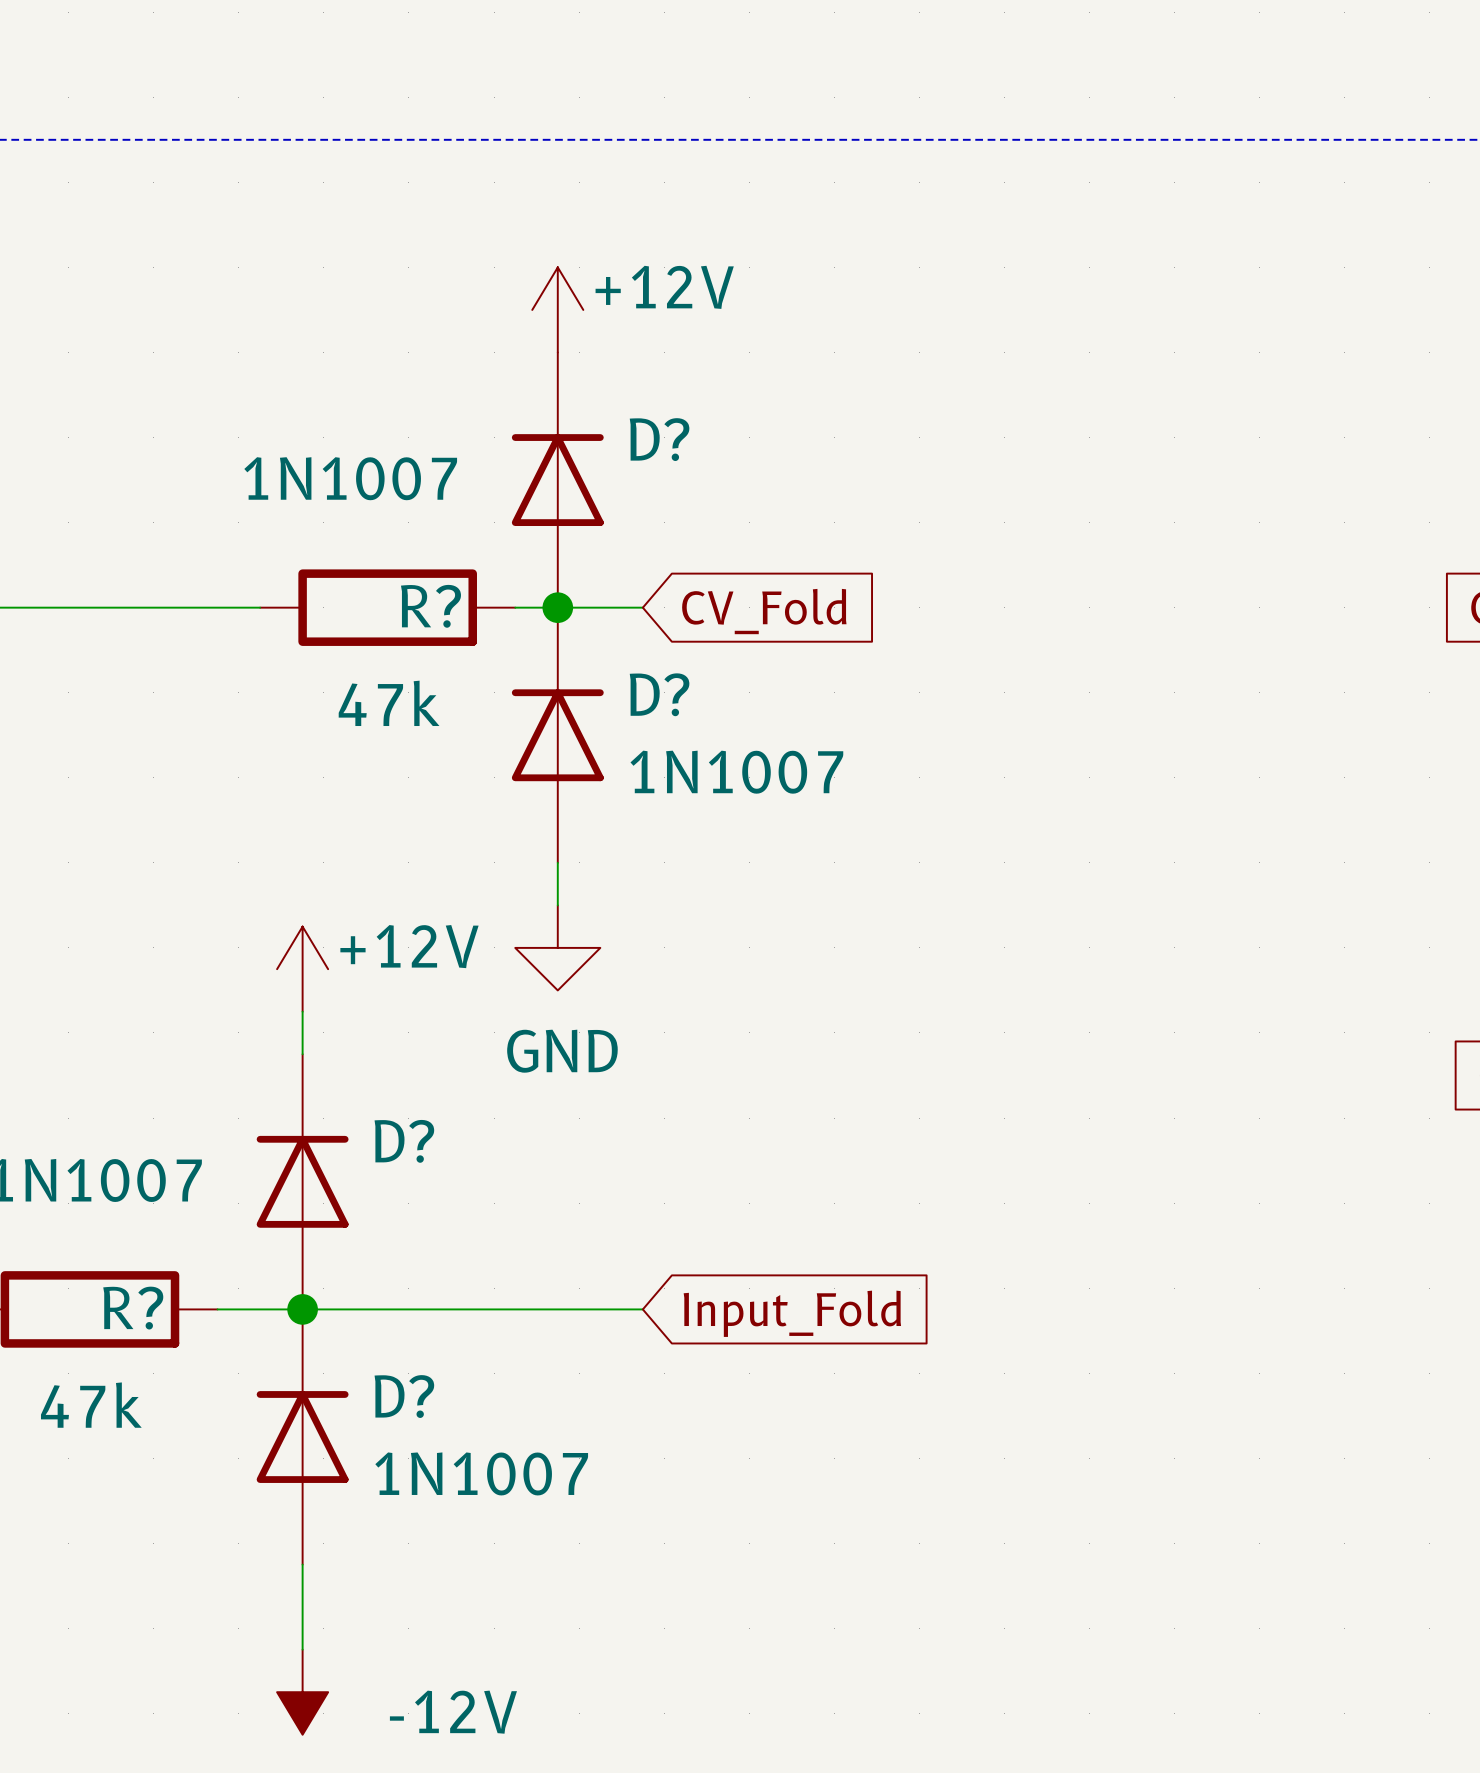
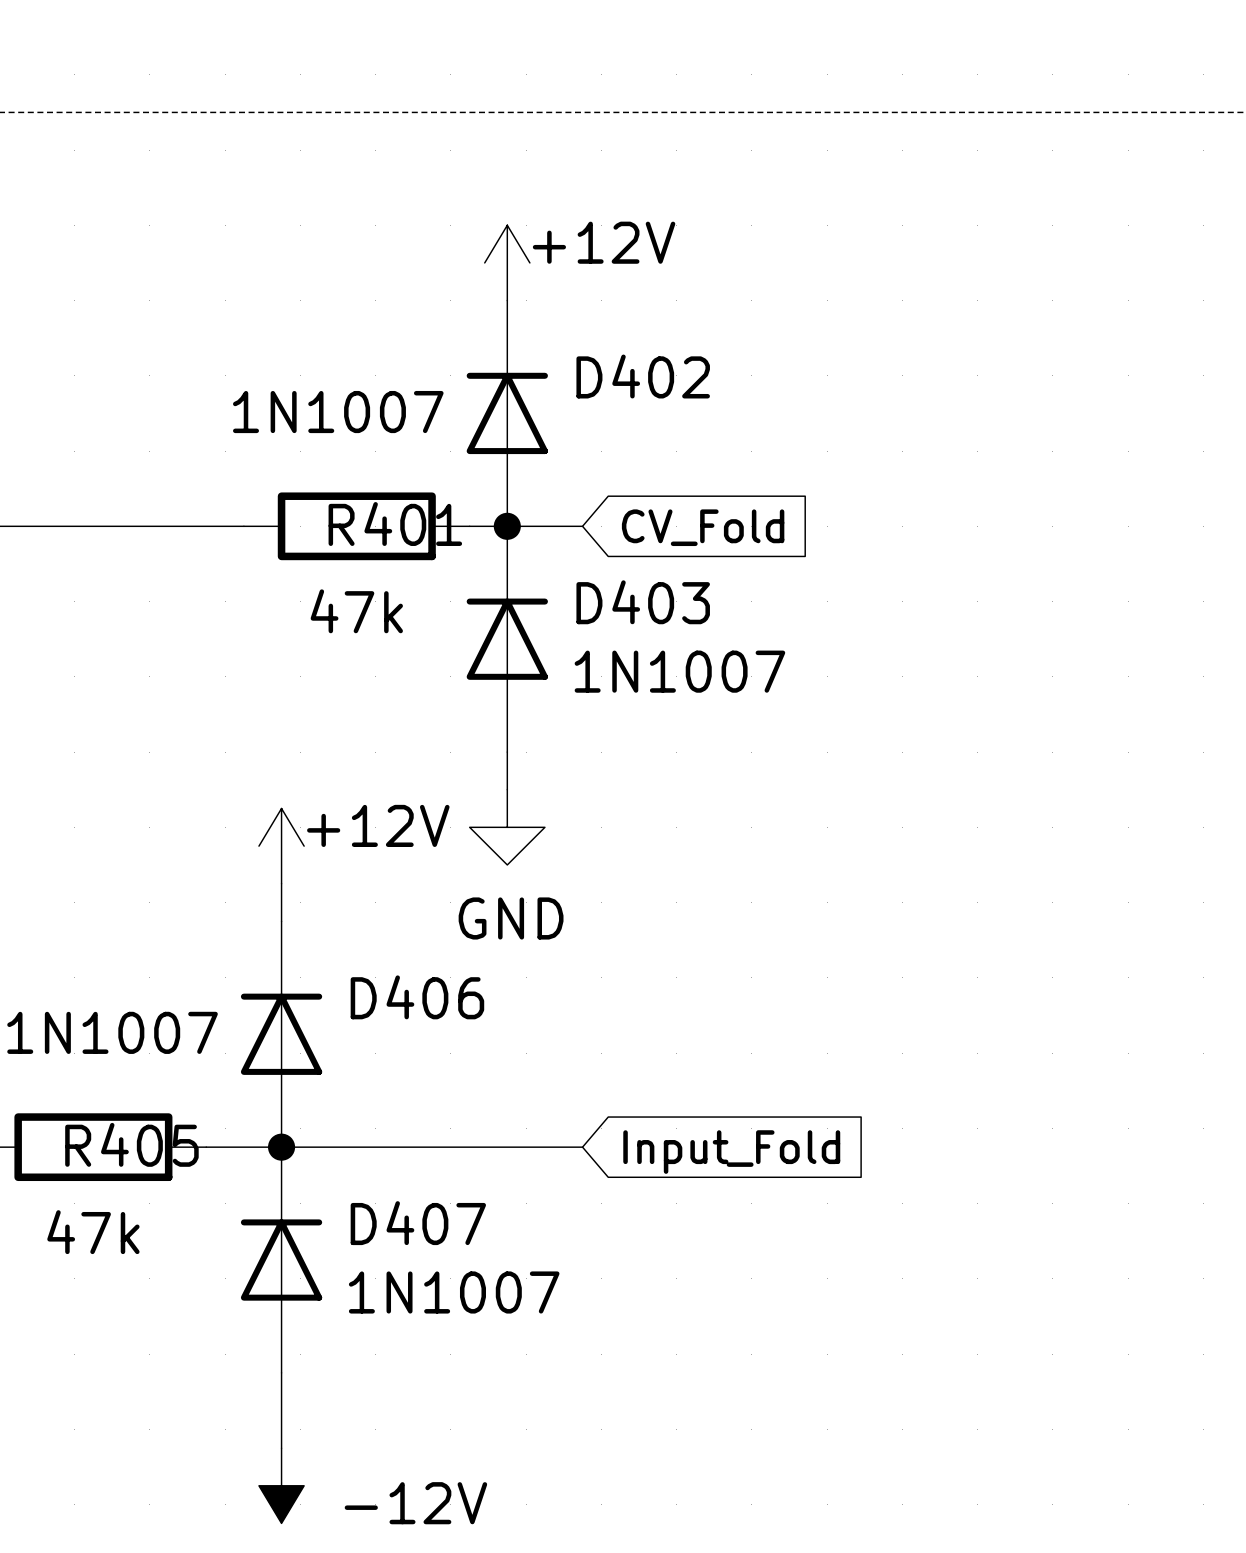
D? name: D? (659, 439) -> D402 (643, 376)
R? name: R? (430, 606) -> R401 (395, 524)
D? name: D? (659, 694) -> D403 (643, 602)
D? name: D? (404, 1141) -> D406 (417, 997)
R? name: R? (133, 1308) -> R405 (131, 1144)
D? name: D? (404, 1396) -> D407 (418, 1223)

